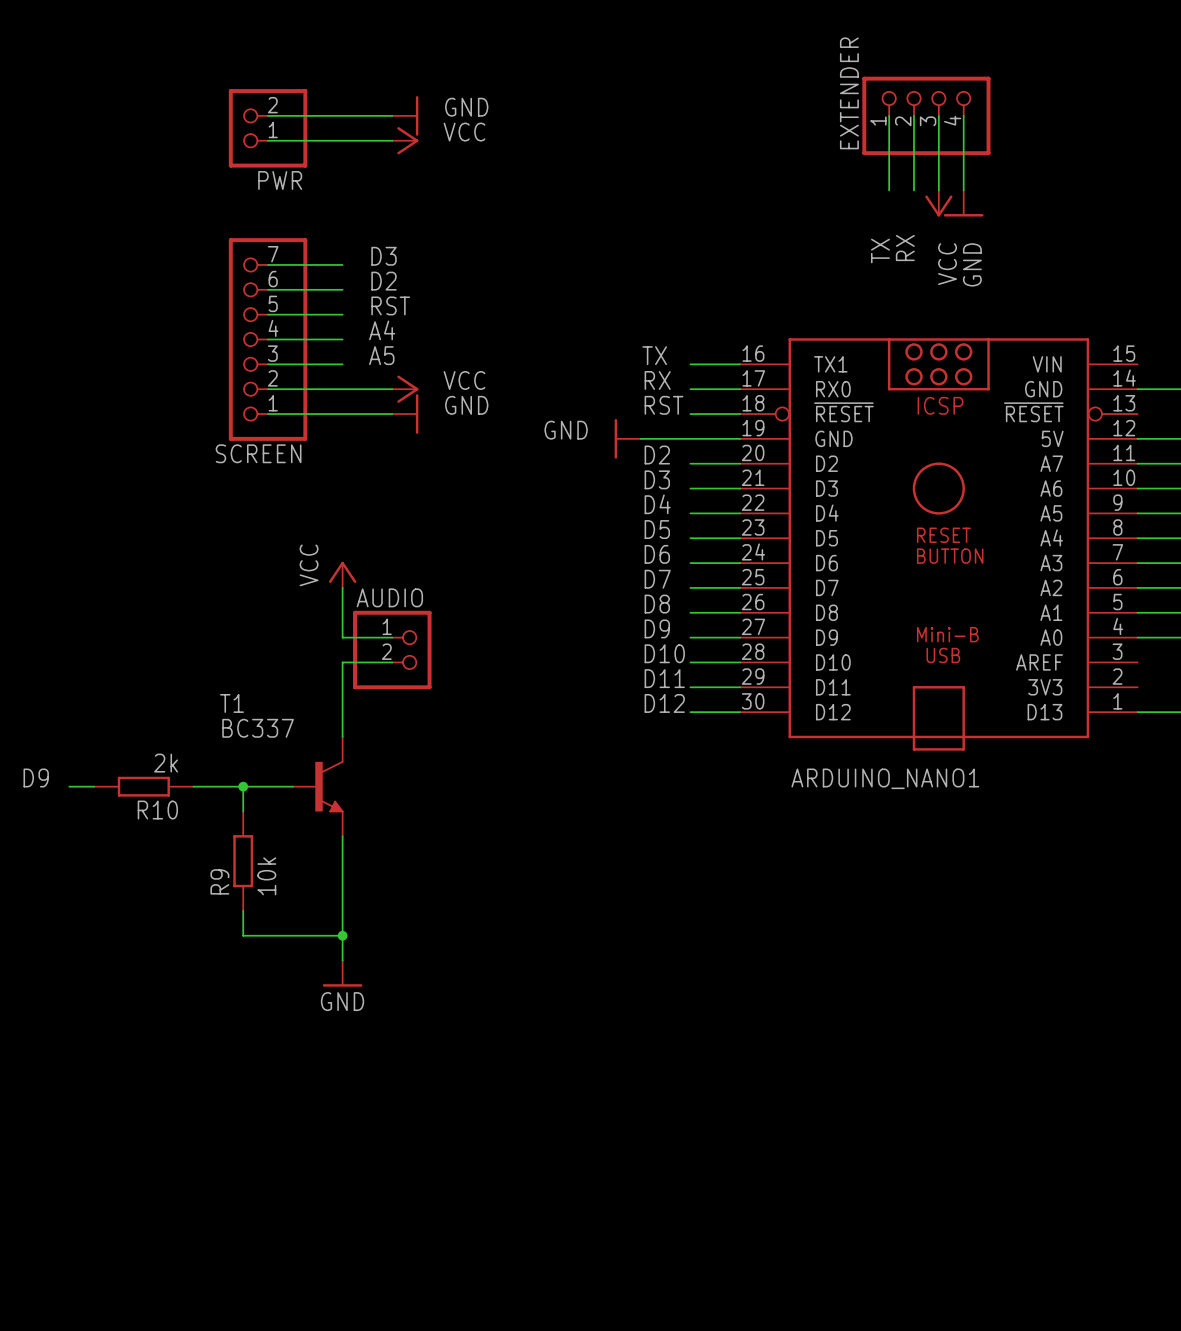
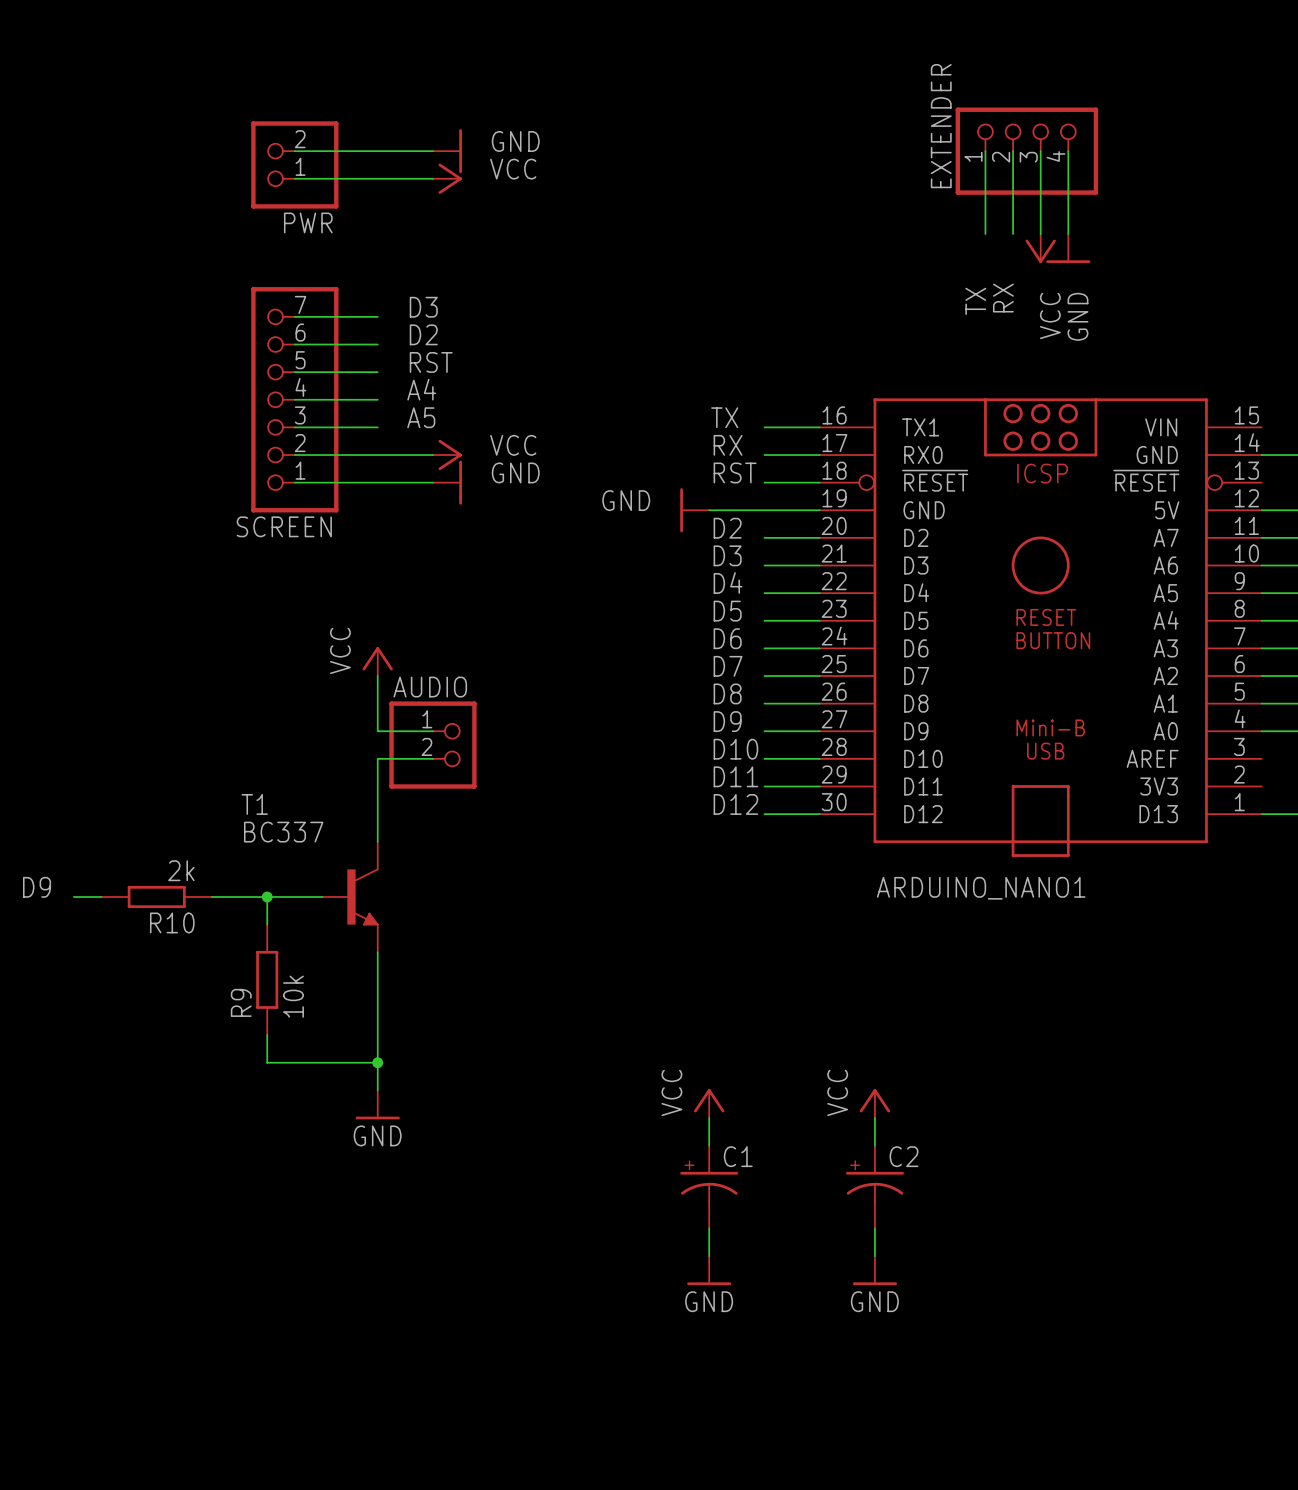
power symbol: none -> VCC (709, 1103)
power symbol: none -> VCC (874, 1103)
wire: none -> (709, 1117) (709, 1145)
wire: none -> (874, 1117) (874, 1145)
C1: none -> (709, 1187)
C2: none -> (874, 1187)
wire: none -> (709, 1228) (709, 1256)
wire: none -> (874, 1228) (874, 1256)
power symbol: none -> GND (709, 1270)
power symbol: none -> GND (874, 1270)

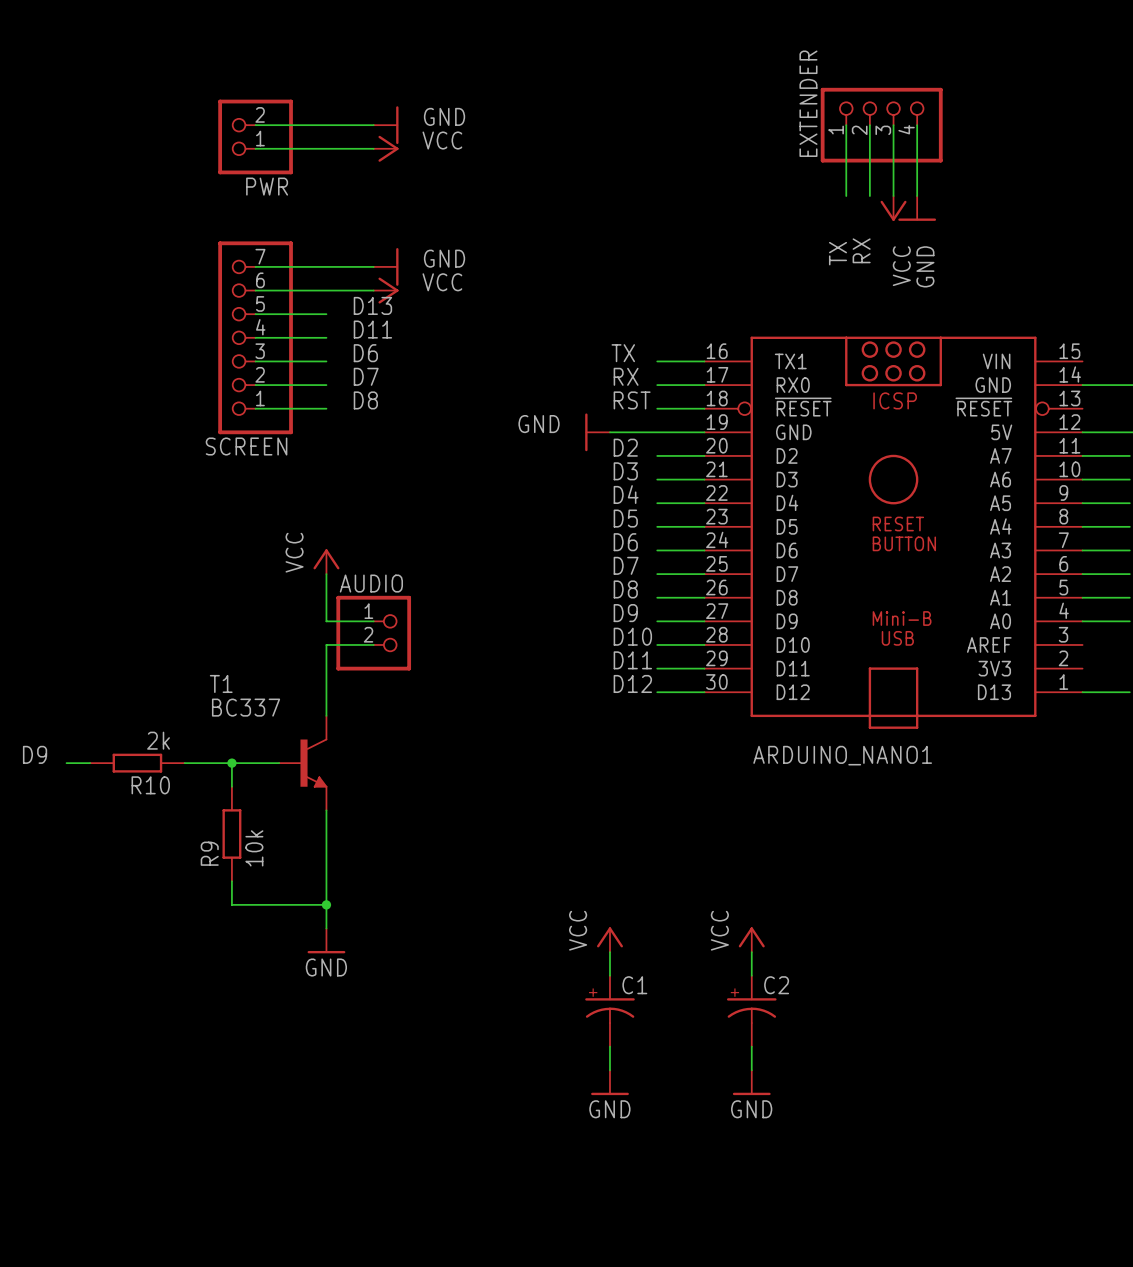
label: D3 (423, 307) -> none
label: D2 (423, 334) -> none
label: RST (431, 362) -> D13 (372, 305)
label: A4 (421, 389) -> D11 (372, 329)
label: A5 (421, 417) -> D6 (365, 353)
label: none -> D7 (366, 376)
wire: (377, 455) (432, 455) -> (326, 290) (373, 290)
power symbol position: VCC (447, 455) -> VCC (386, 290)
label: none -> D8 (365, 400)
wire: (377, 482) (432, 482) -> (326, 266) (373, 266)
power symbol position: GND (447, 482) -> GND (386, 266)

